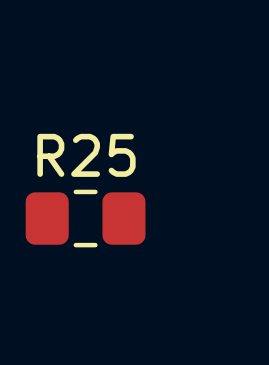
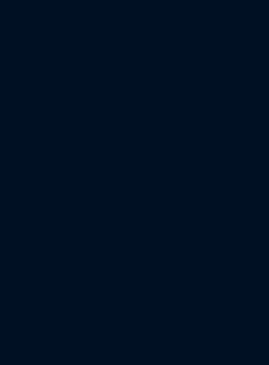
R25: (85, 218) -> none

